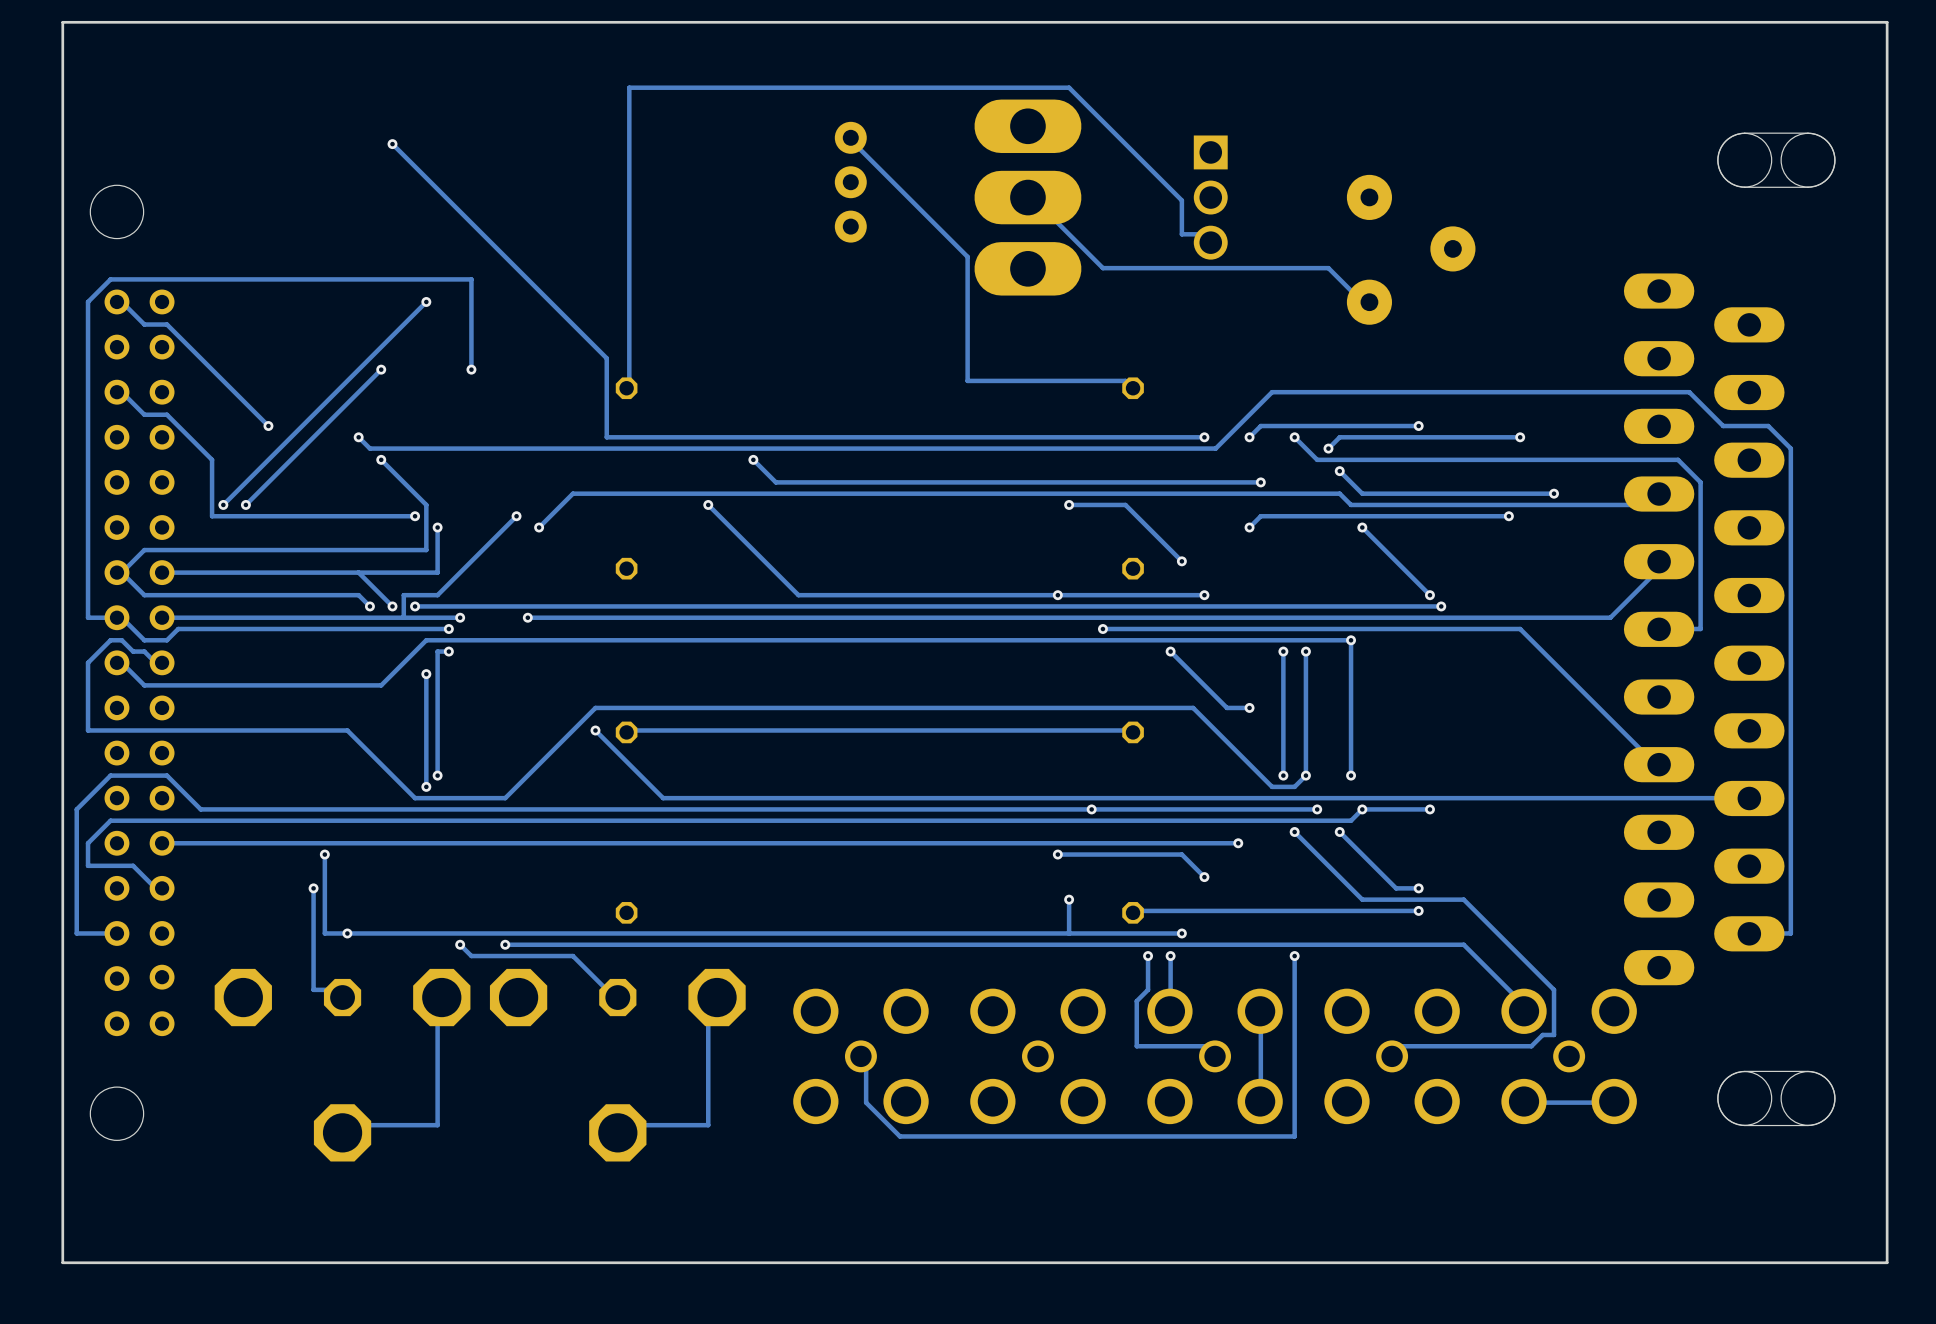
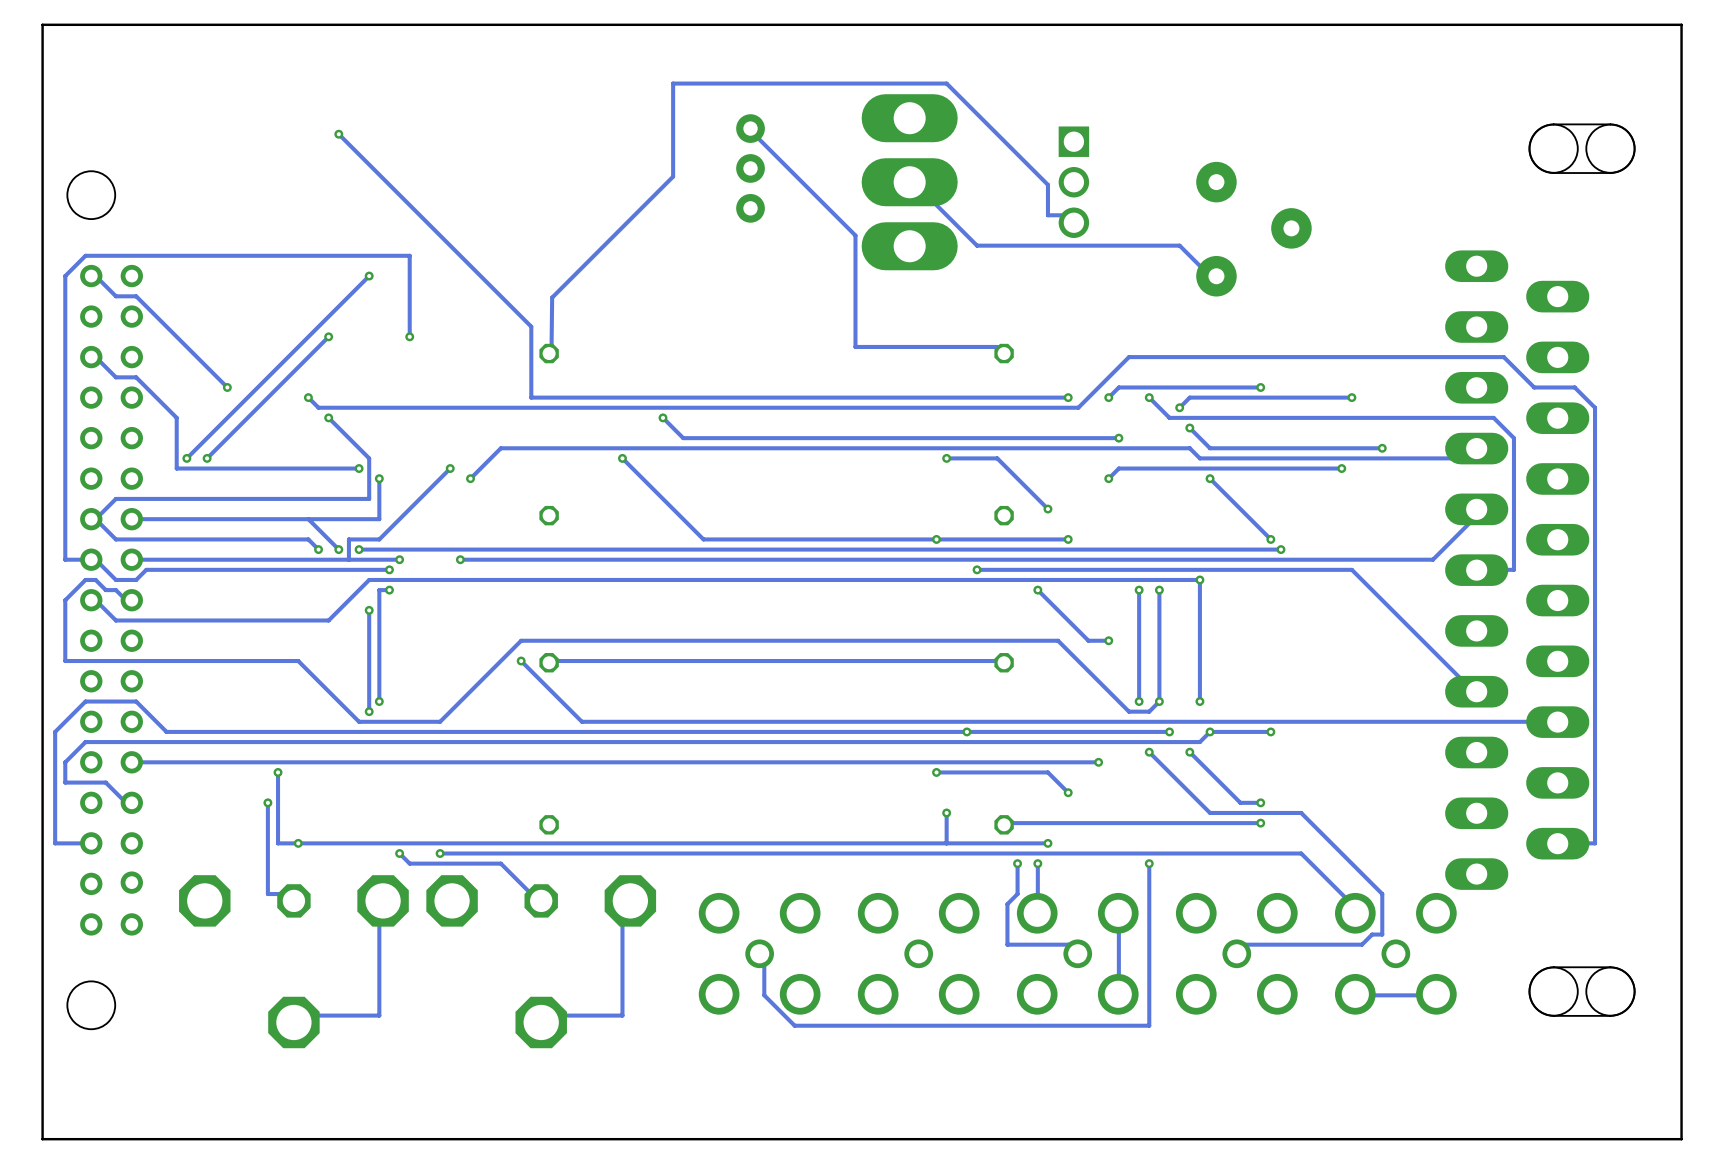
track: (764, 87) (629, 87) (629, 380) -> (673, 83) (673, 176) (552, 297) (551, 346)

